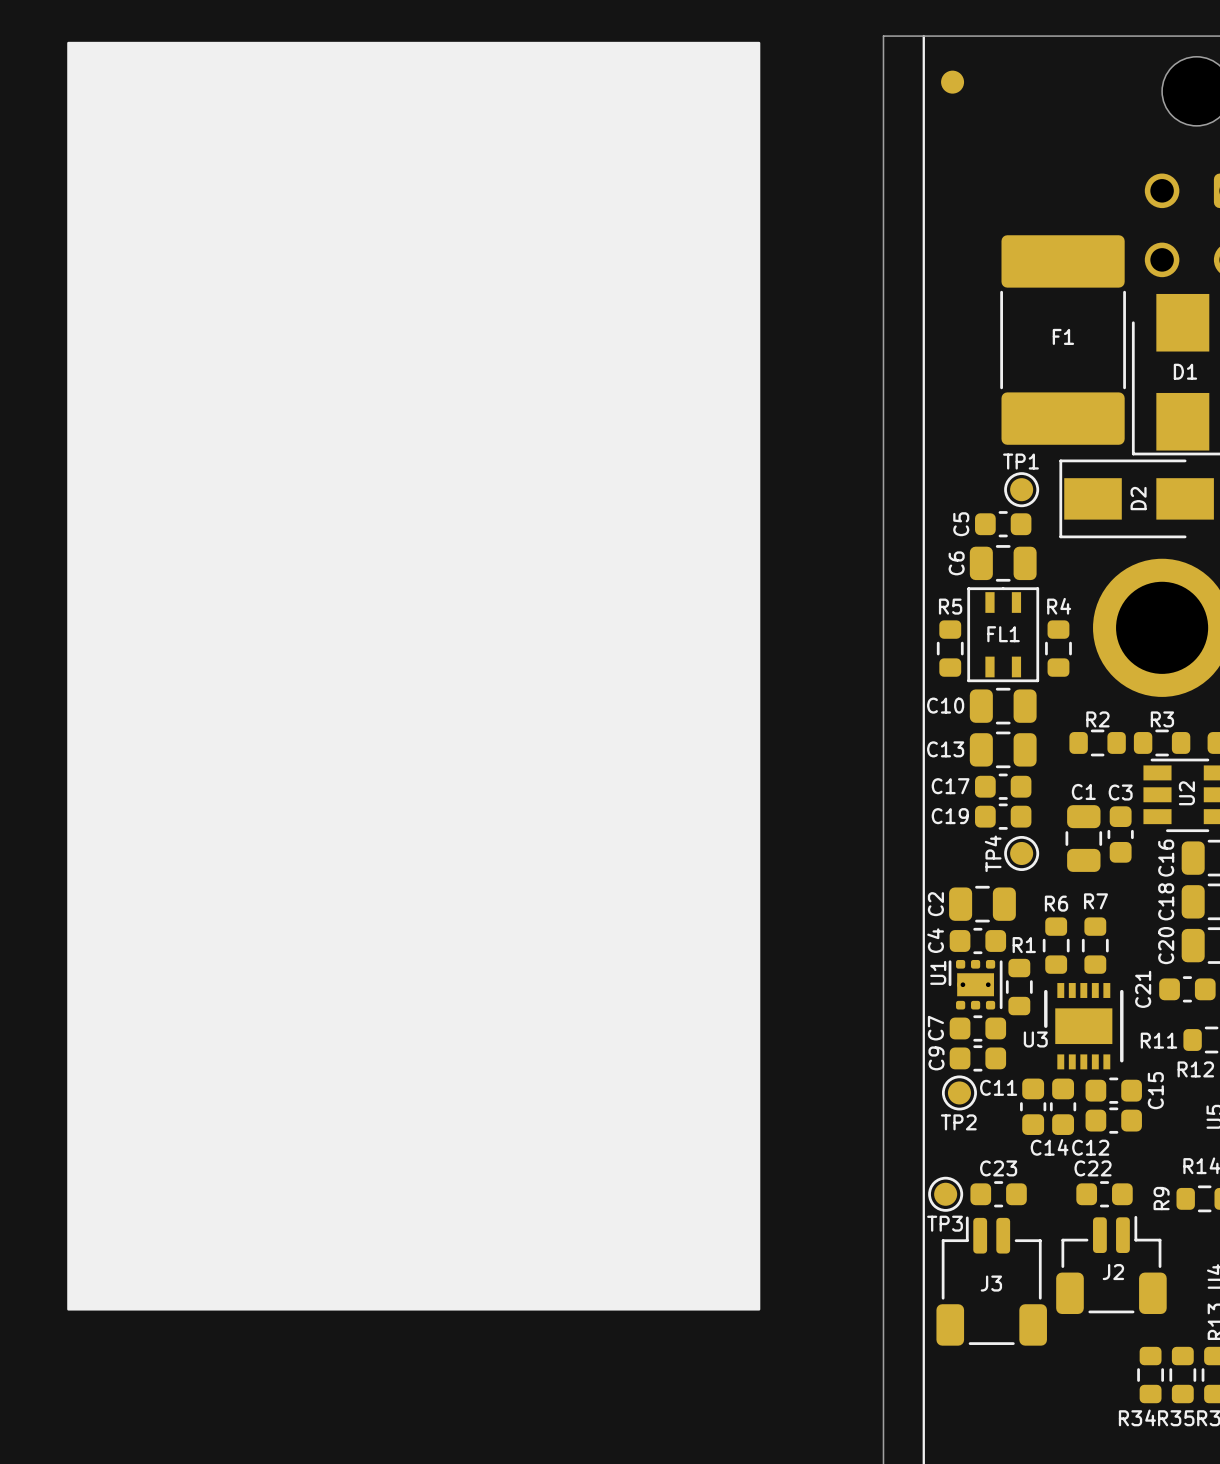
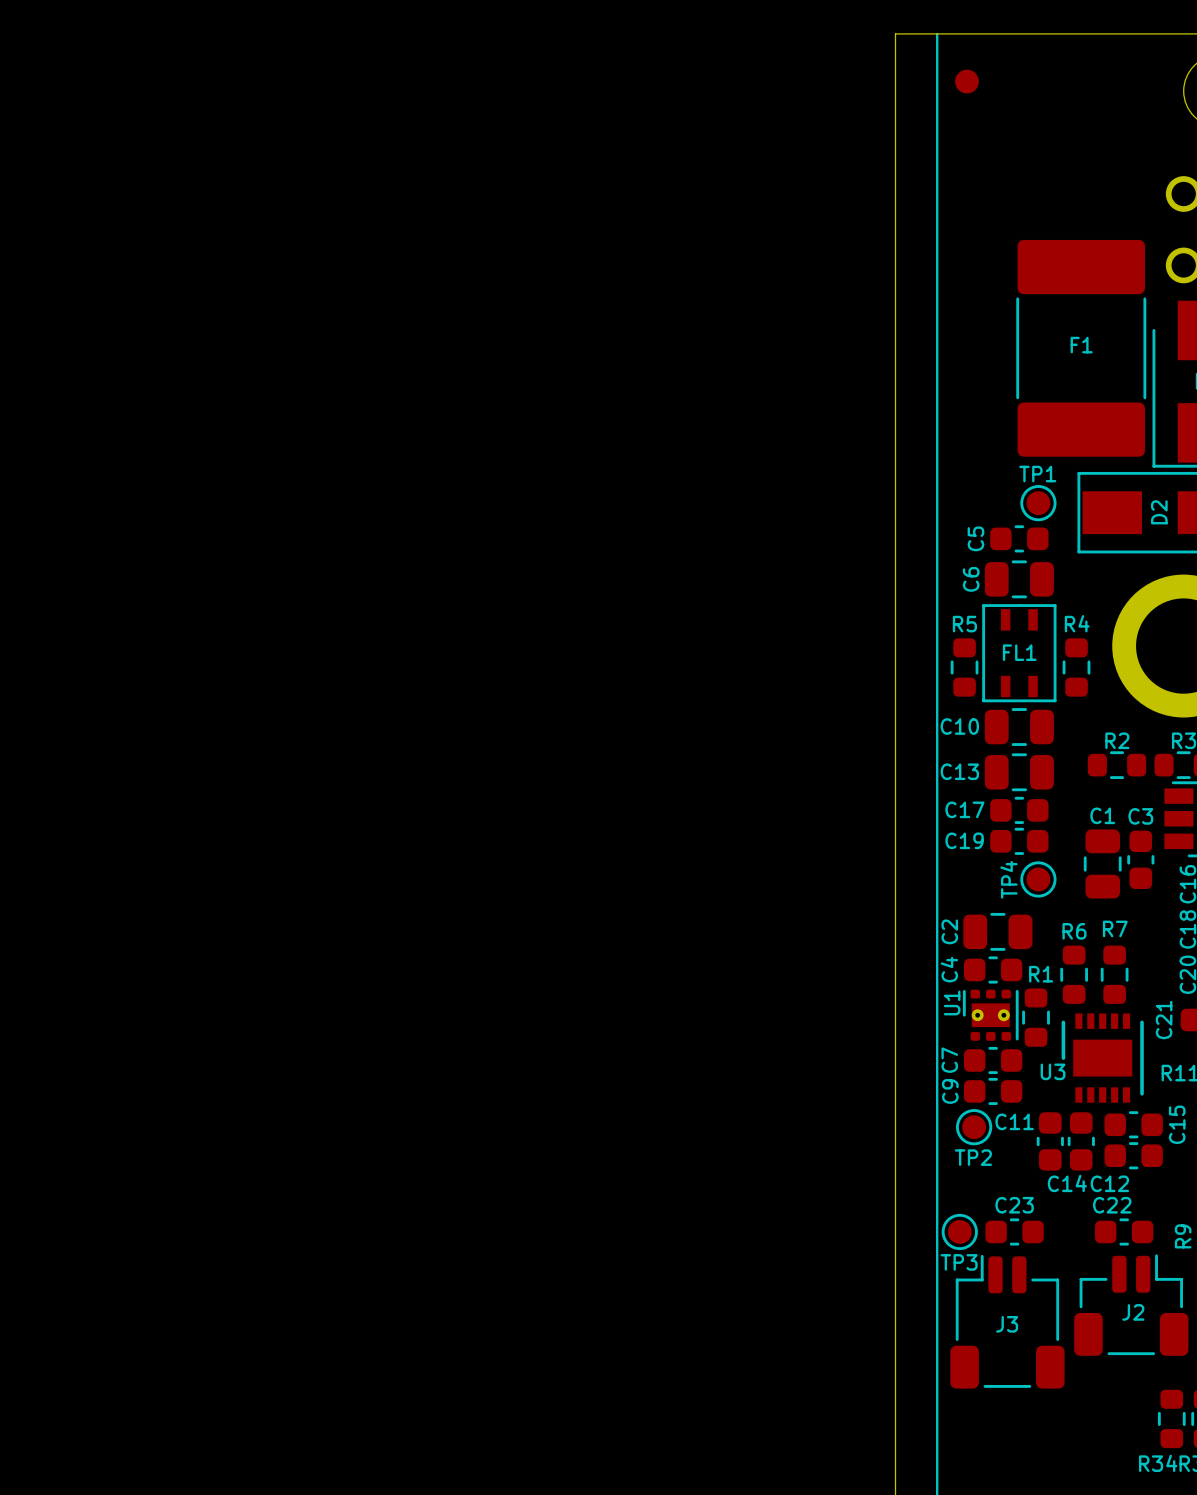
drawing: [67, 41, 761, 1311] -> none

